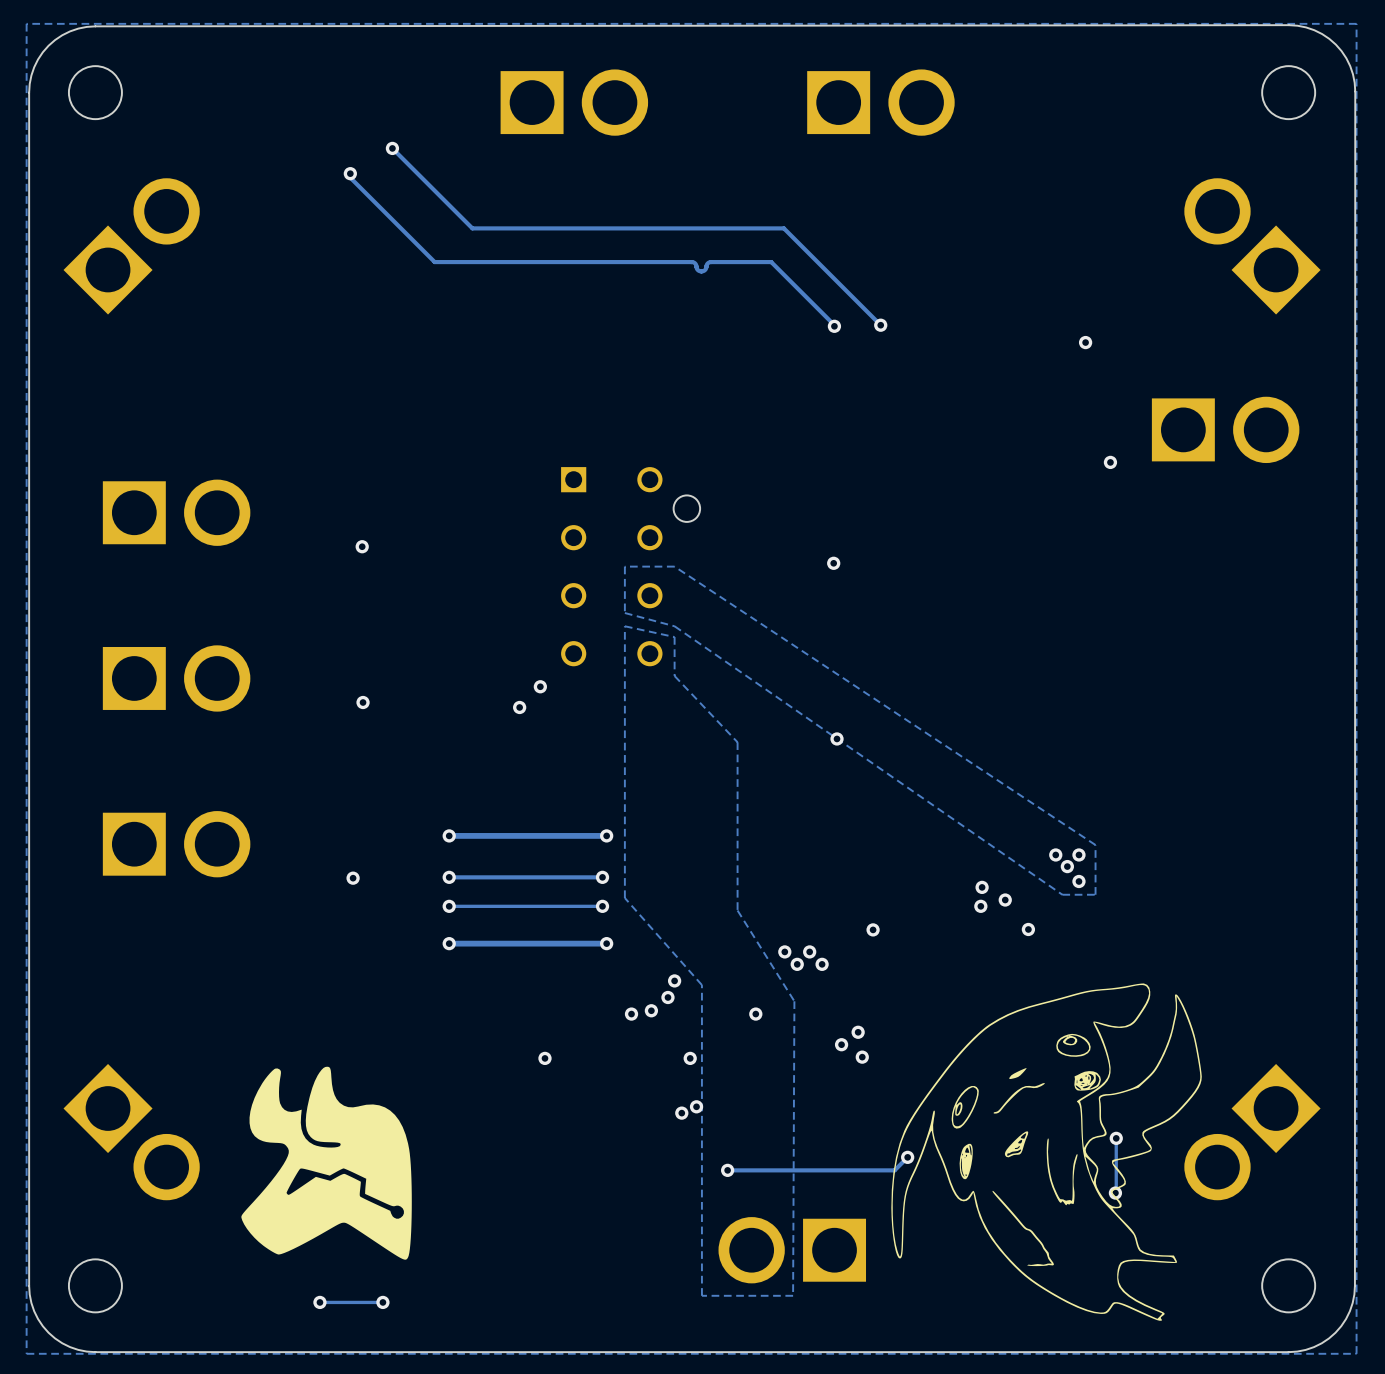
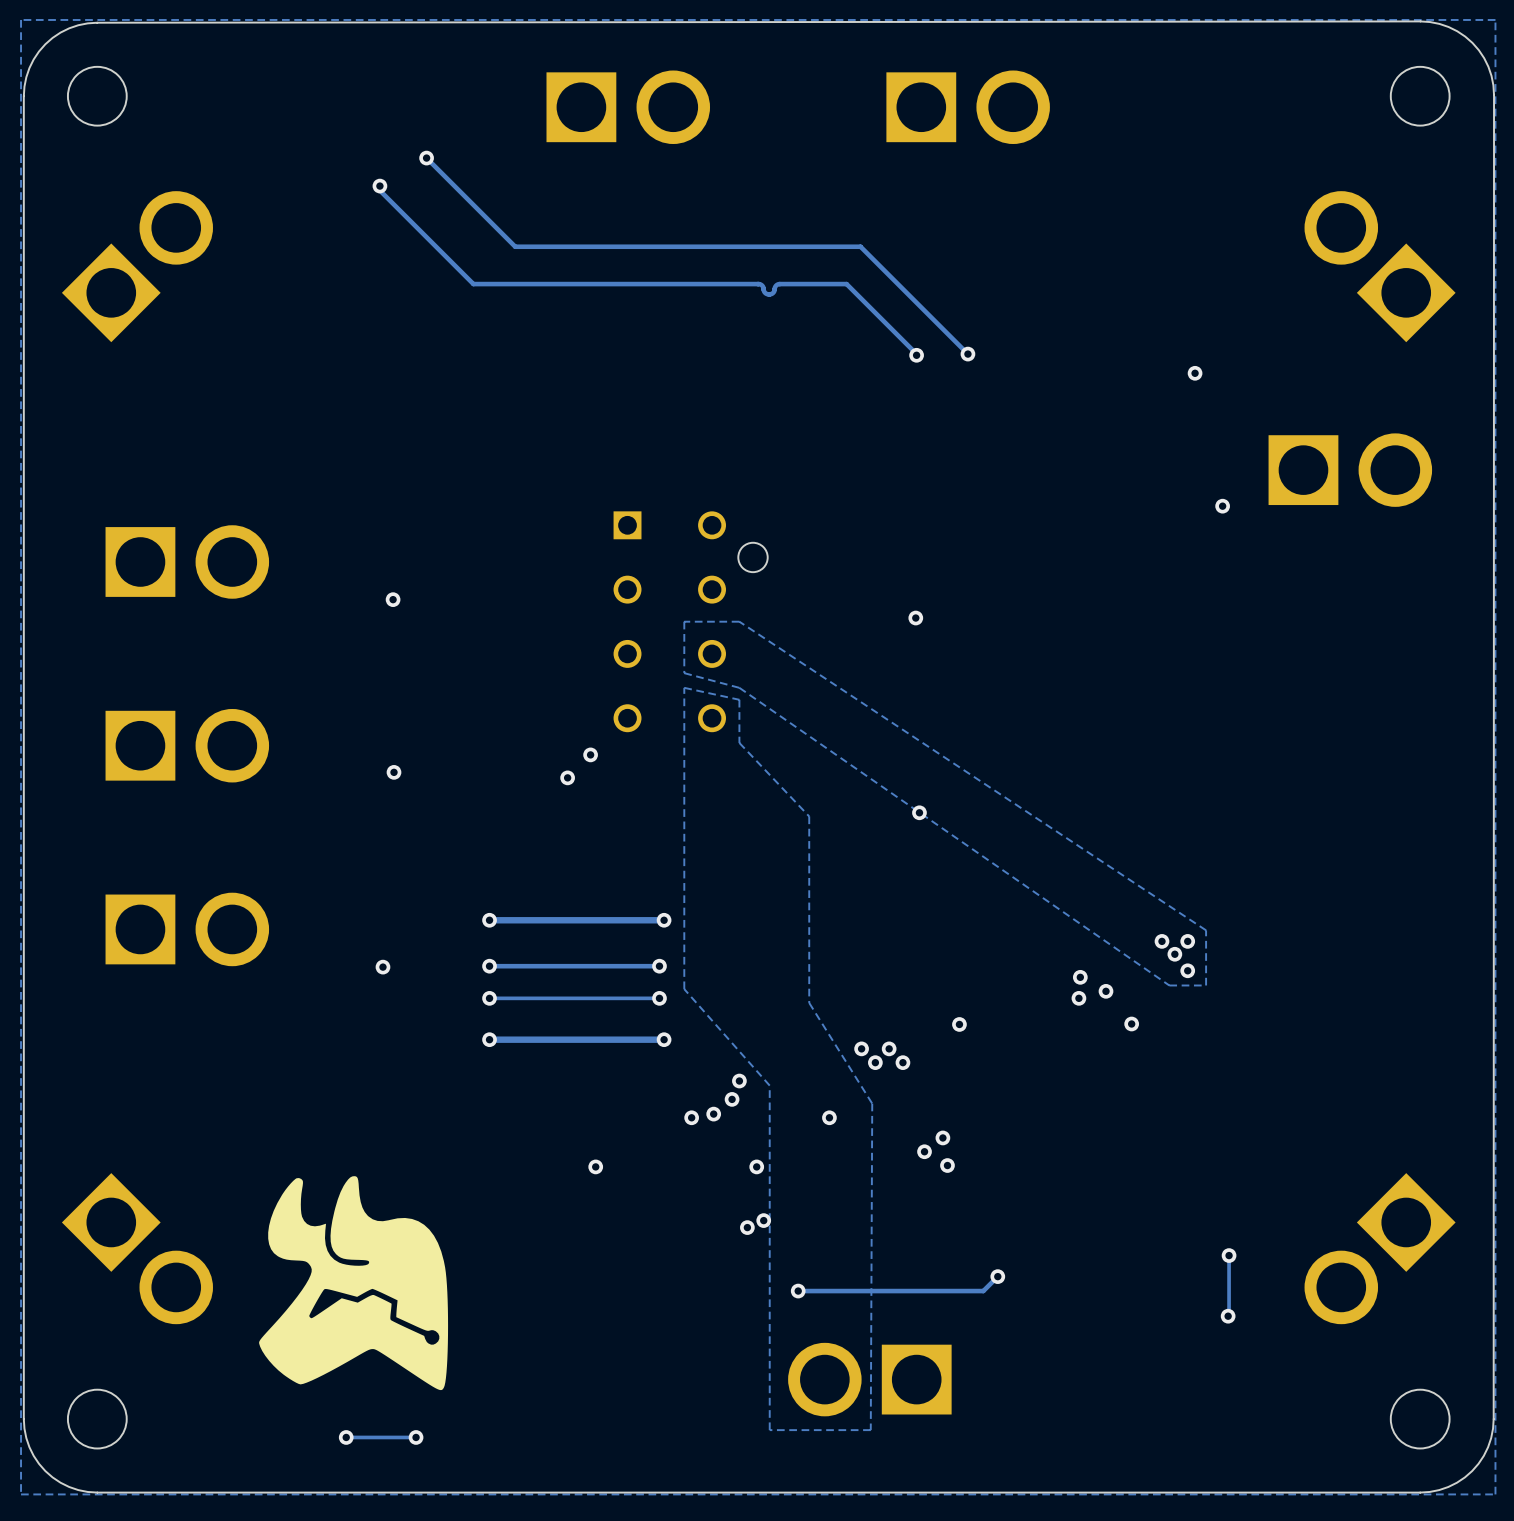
drawing: [891, 983, 1202, 1321] -> none

